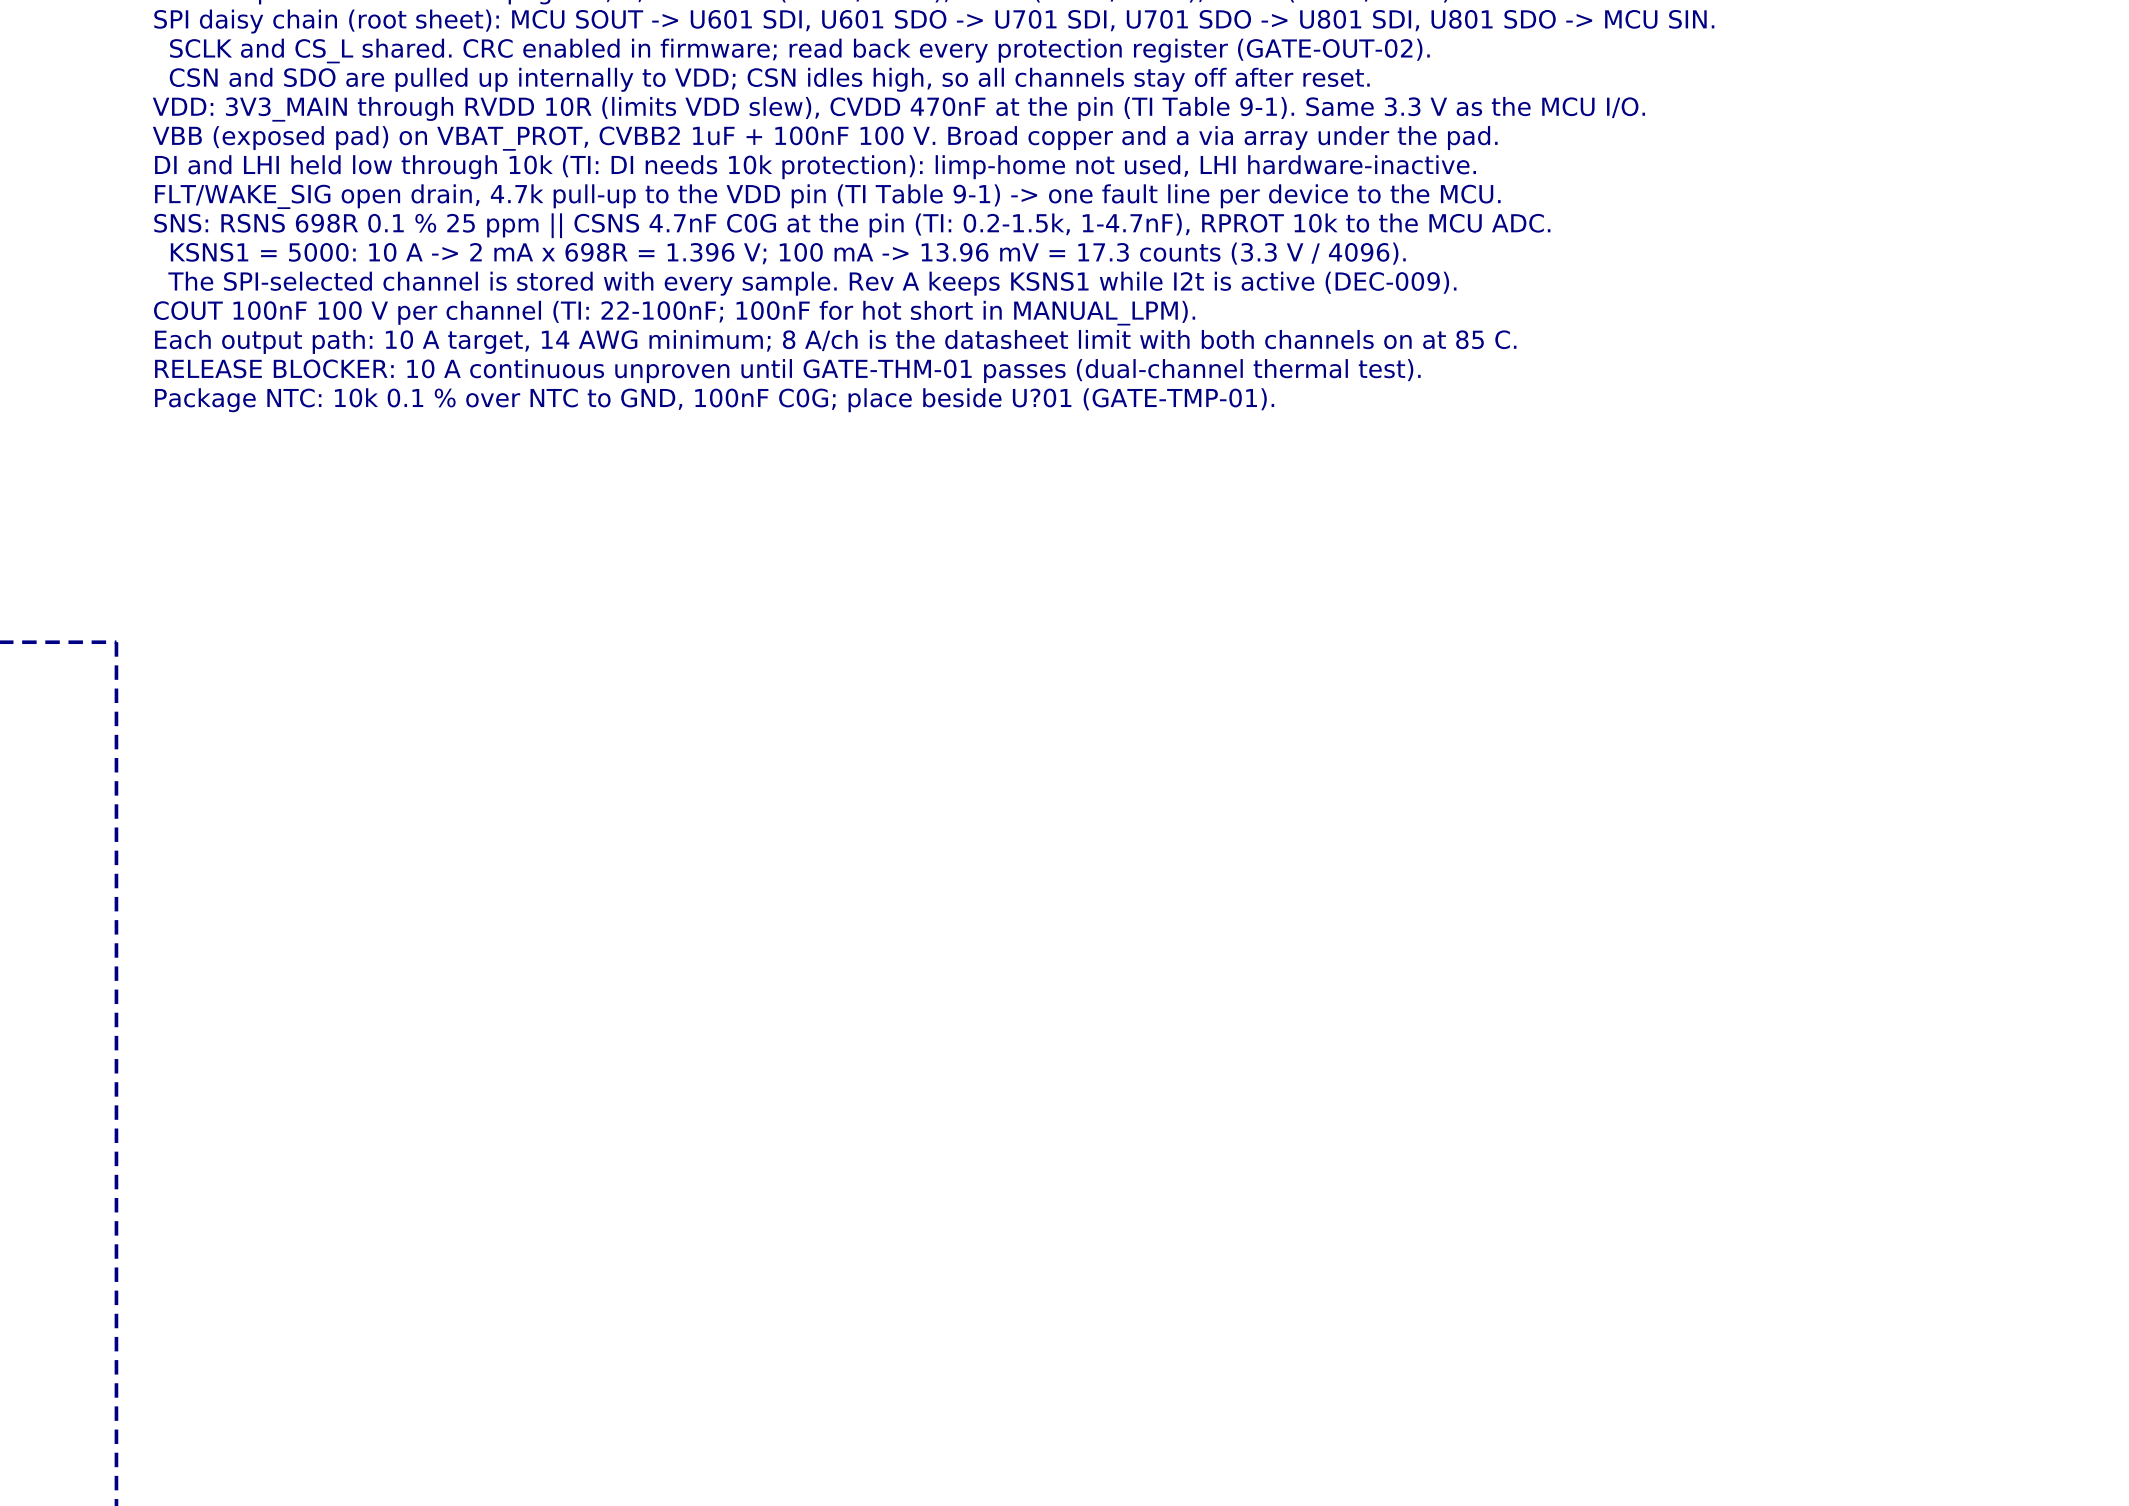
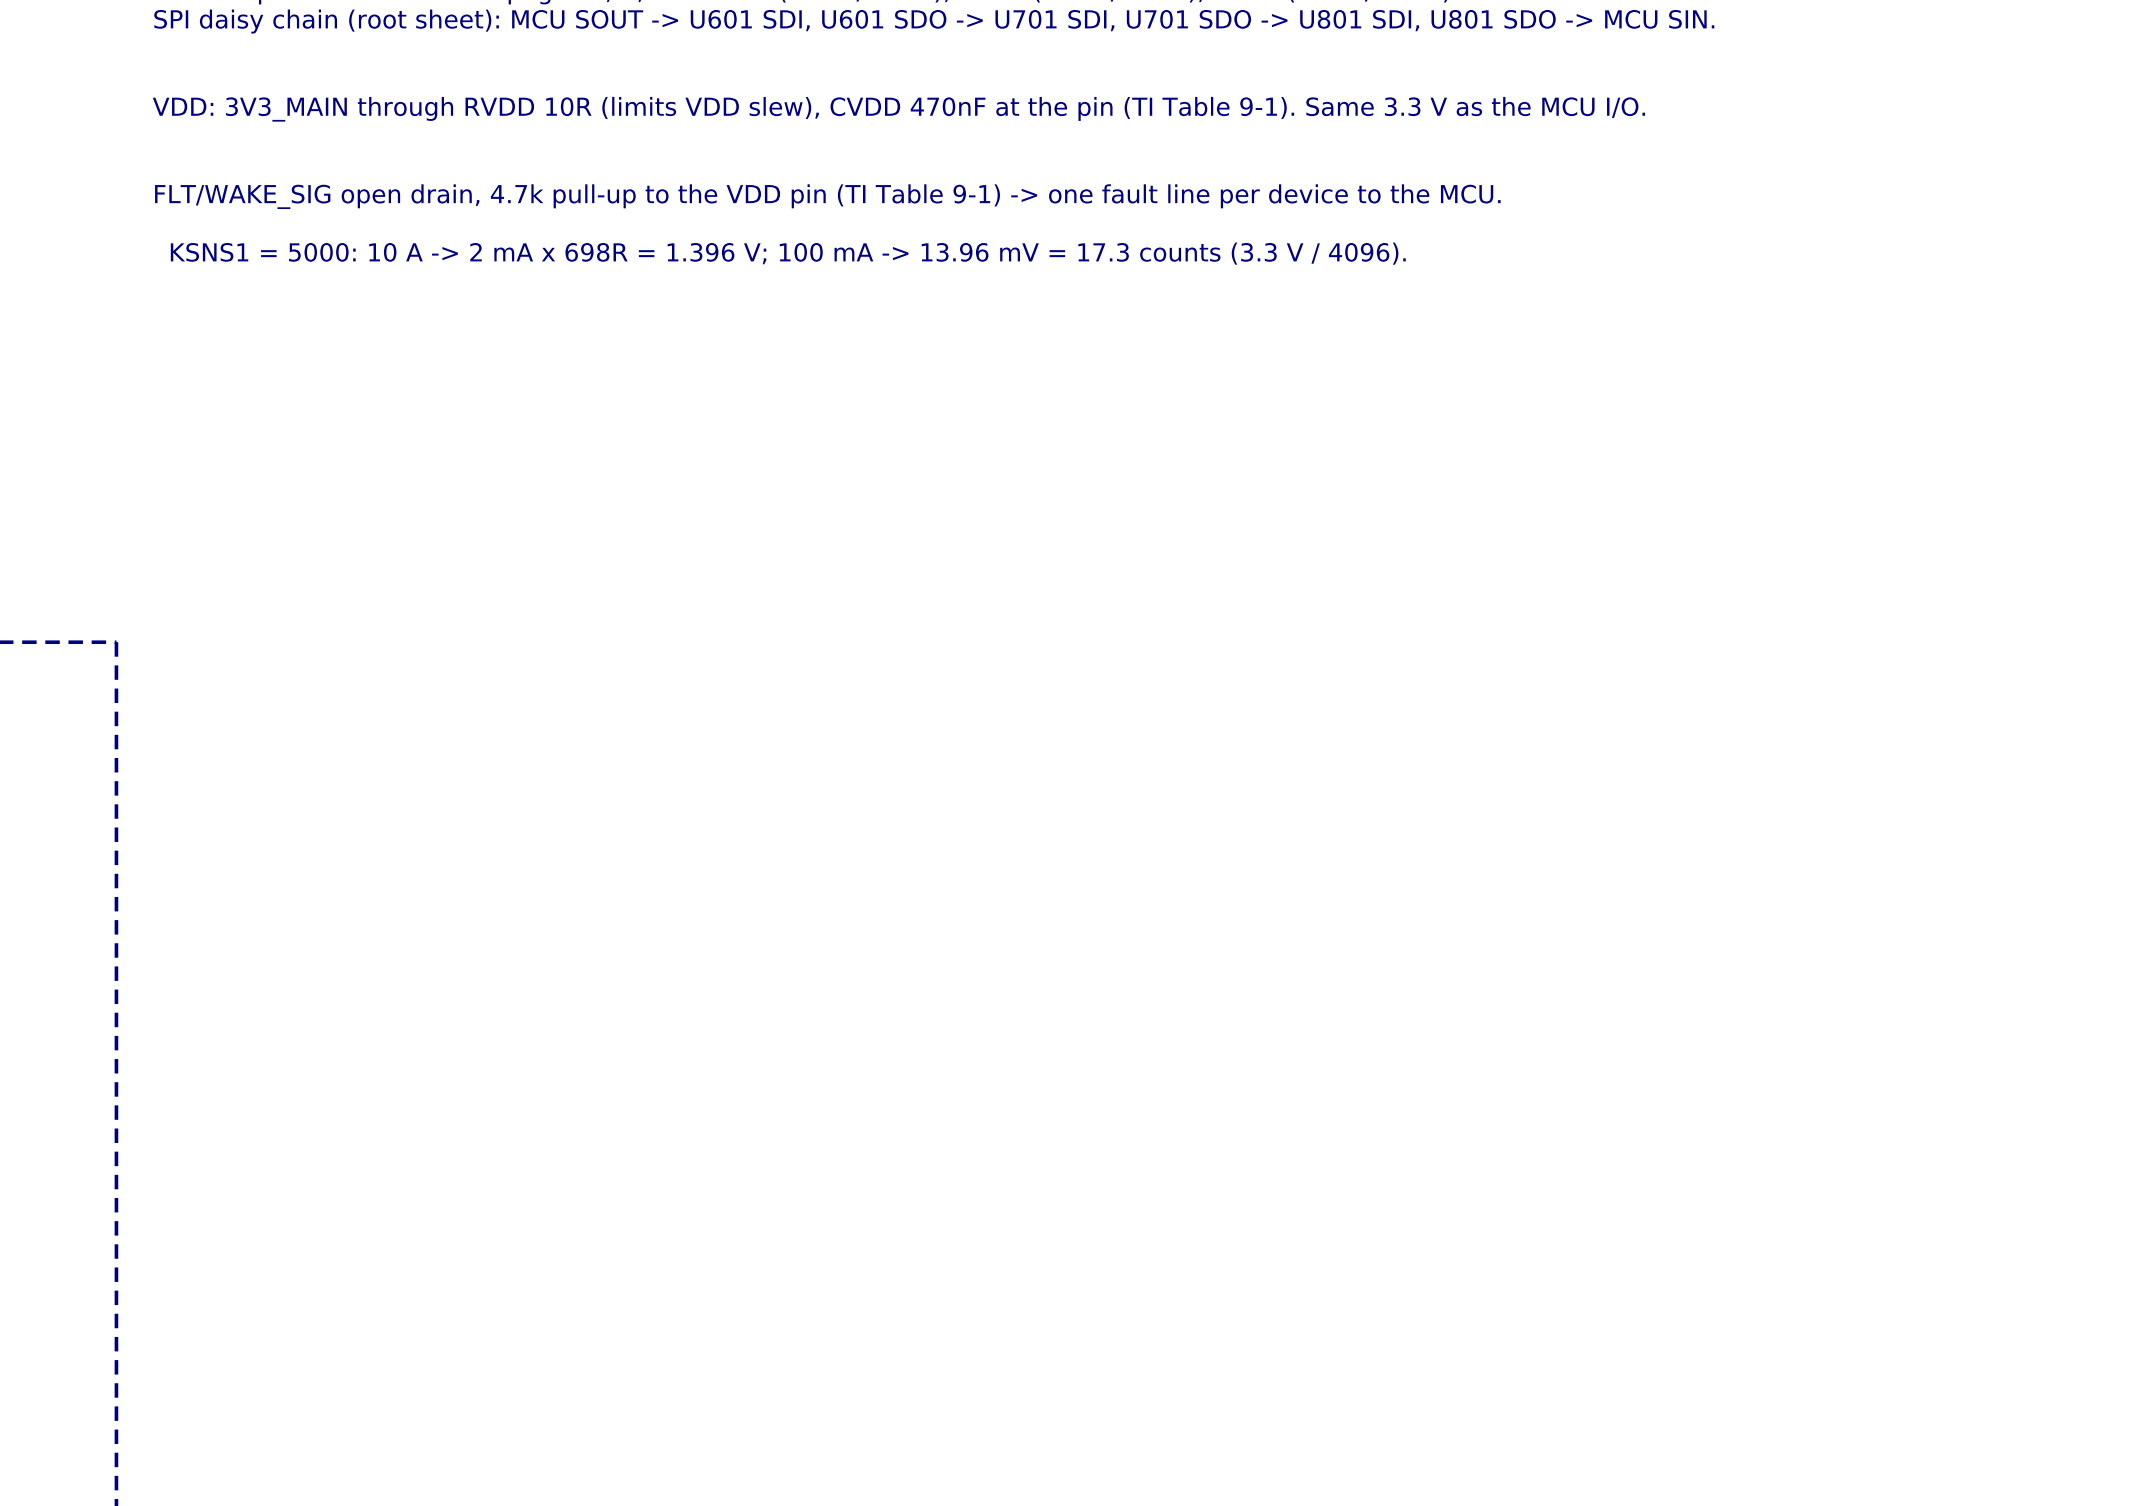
text: SCLK and CS_L shared. CRC enabled in firmware; read back every protection register (GATE-OUT-02). (799, 51) -> none
text: CSN and SDO are pulled up internally to VDD; CSN idles high, so all channels stay off after reset. (769, 79) -> none
text: VBB (exposed pad) on VBAT_PROT, CVBB2 1uF + 100nF 100 V. Broad copper and a via array under the pad. (825, 138) -> none
text: DI and LHI held low through 10k (TI: DI needs 10k protection): limp-home not used, LHI hardware-inactive. (815, 167) -> none
text: SNS: RSNS 698R 0.1 % 25 ppm || CSNS 4.7nF C0G at the pin (TI: 0.2-1.5k, 1-4.7nF), RPROT 10k to the MCU ADC. (852, 225) -> none
text: The SPI-selected channel is stored with every sample. Rev A keeps KSNS1 while I2t is active (DEC-009). (812, 283) -> none
text: COUT 100nF 100 V per channel (TI: 22-100nF; 100nF for hot short in MANUAL_LPM). (674, 313) -> none
text: Each output path: 10 A target, 14 AWG minimum; 8 A/ch is the datasheet limit with both channels on at 85 C. (835, 341) -> none
text: RELEASE BLOCKER: 10 A continuous unproven until GATE-THM-01 passes (dual-channel thermal test). (787, 371) -> none
text: Package NTC: 10k 0.1 % over NTC to GND, 100nF C0G; place beside U?01 (GATE-TMP-01). (714, 400) -> none

